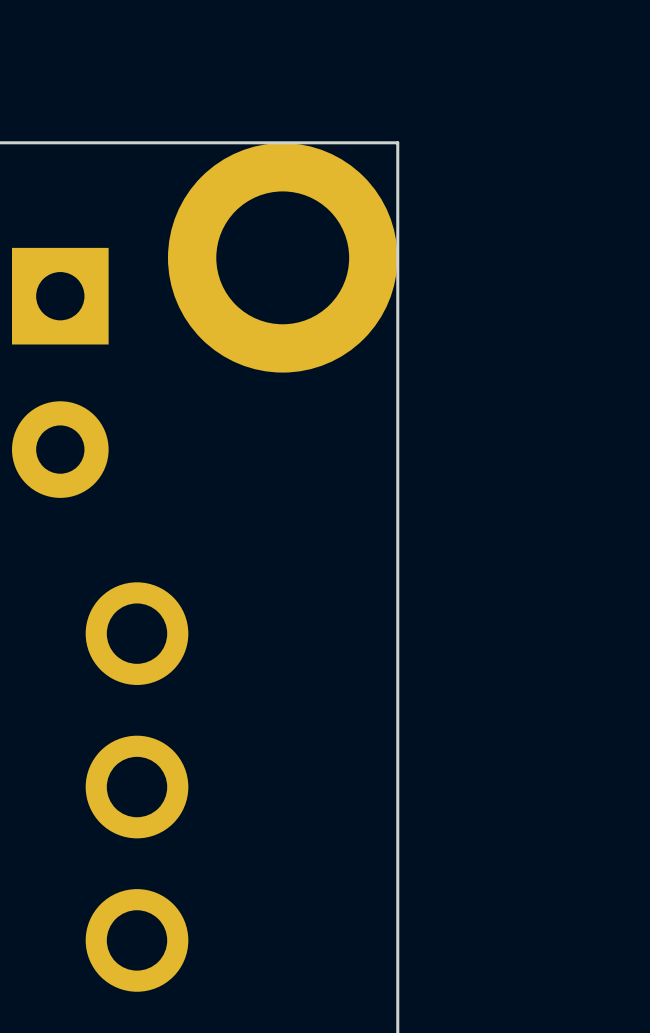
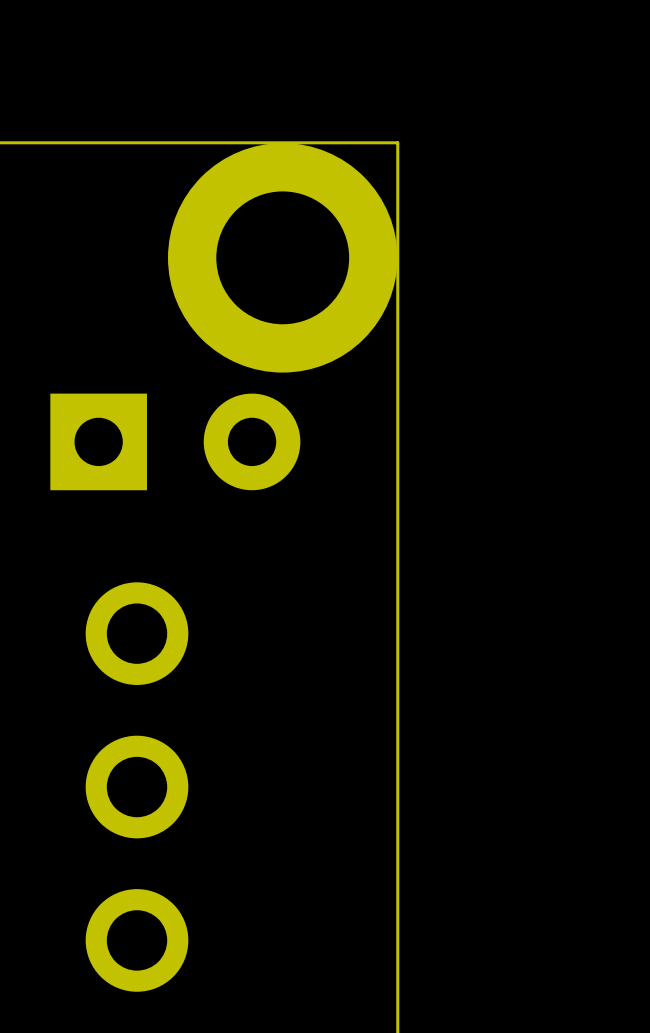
part rotation: 0° (60, 372) -> 90° counterclockwise (175, 441)

